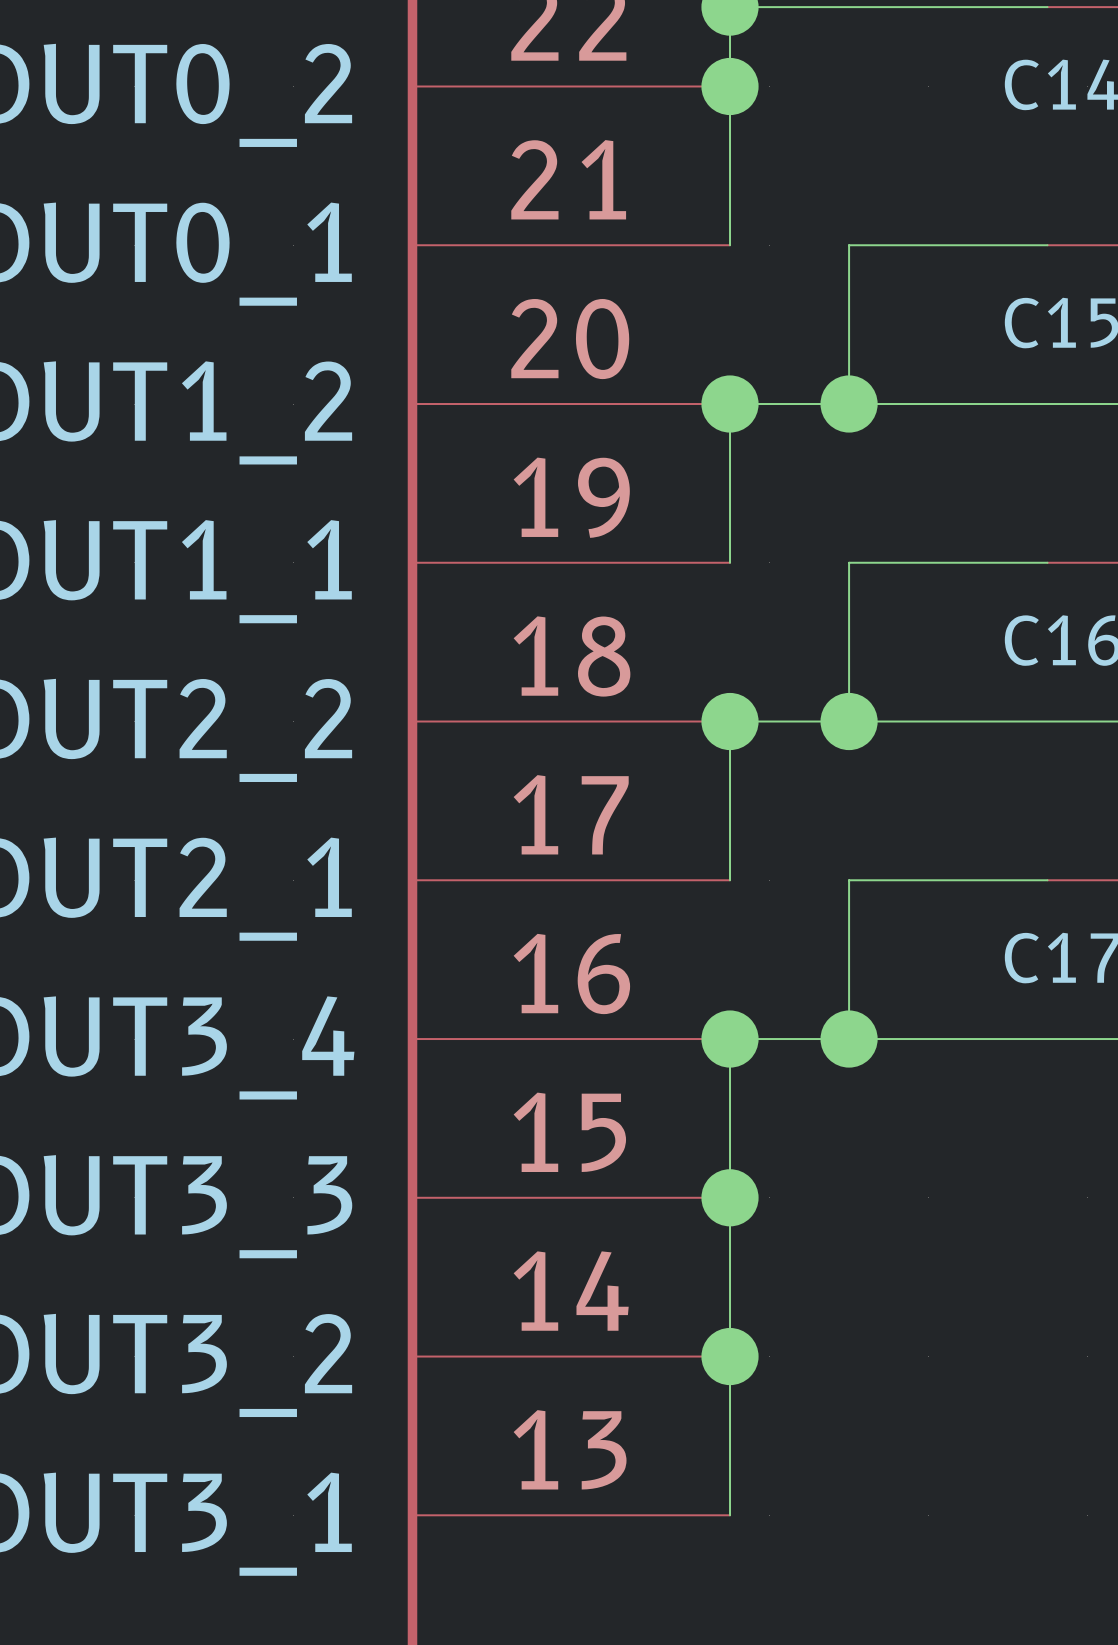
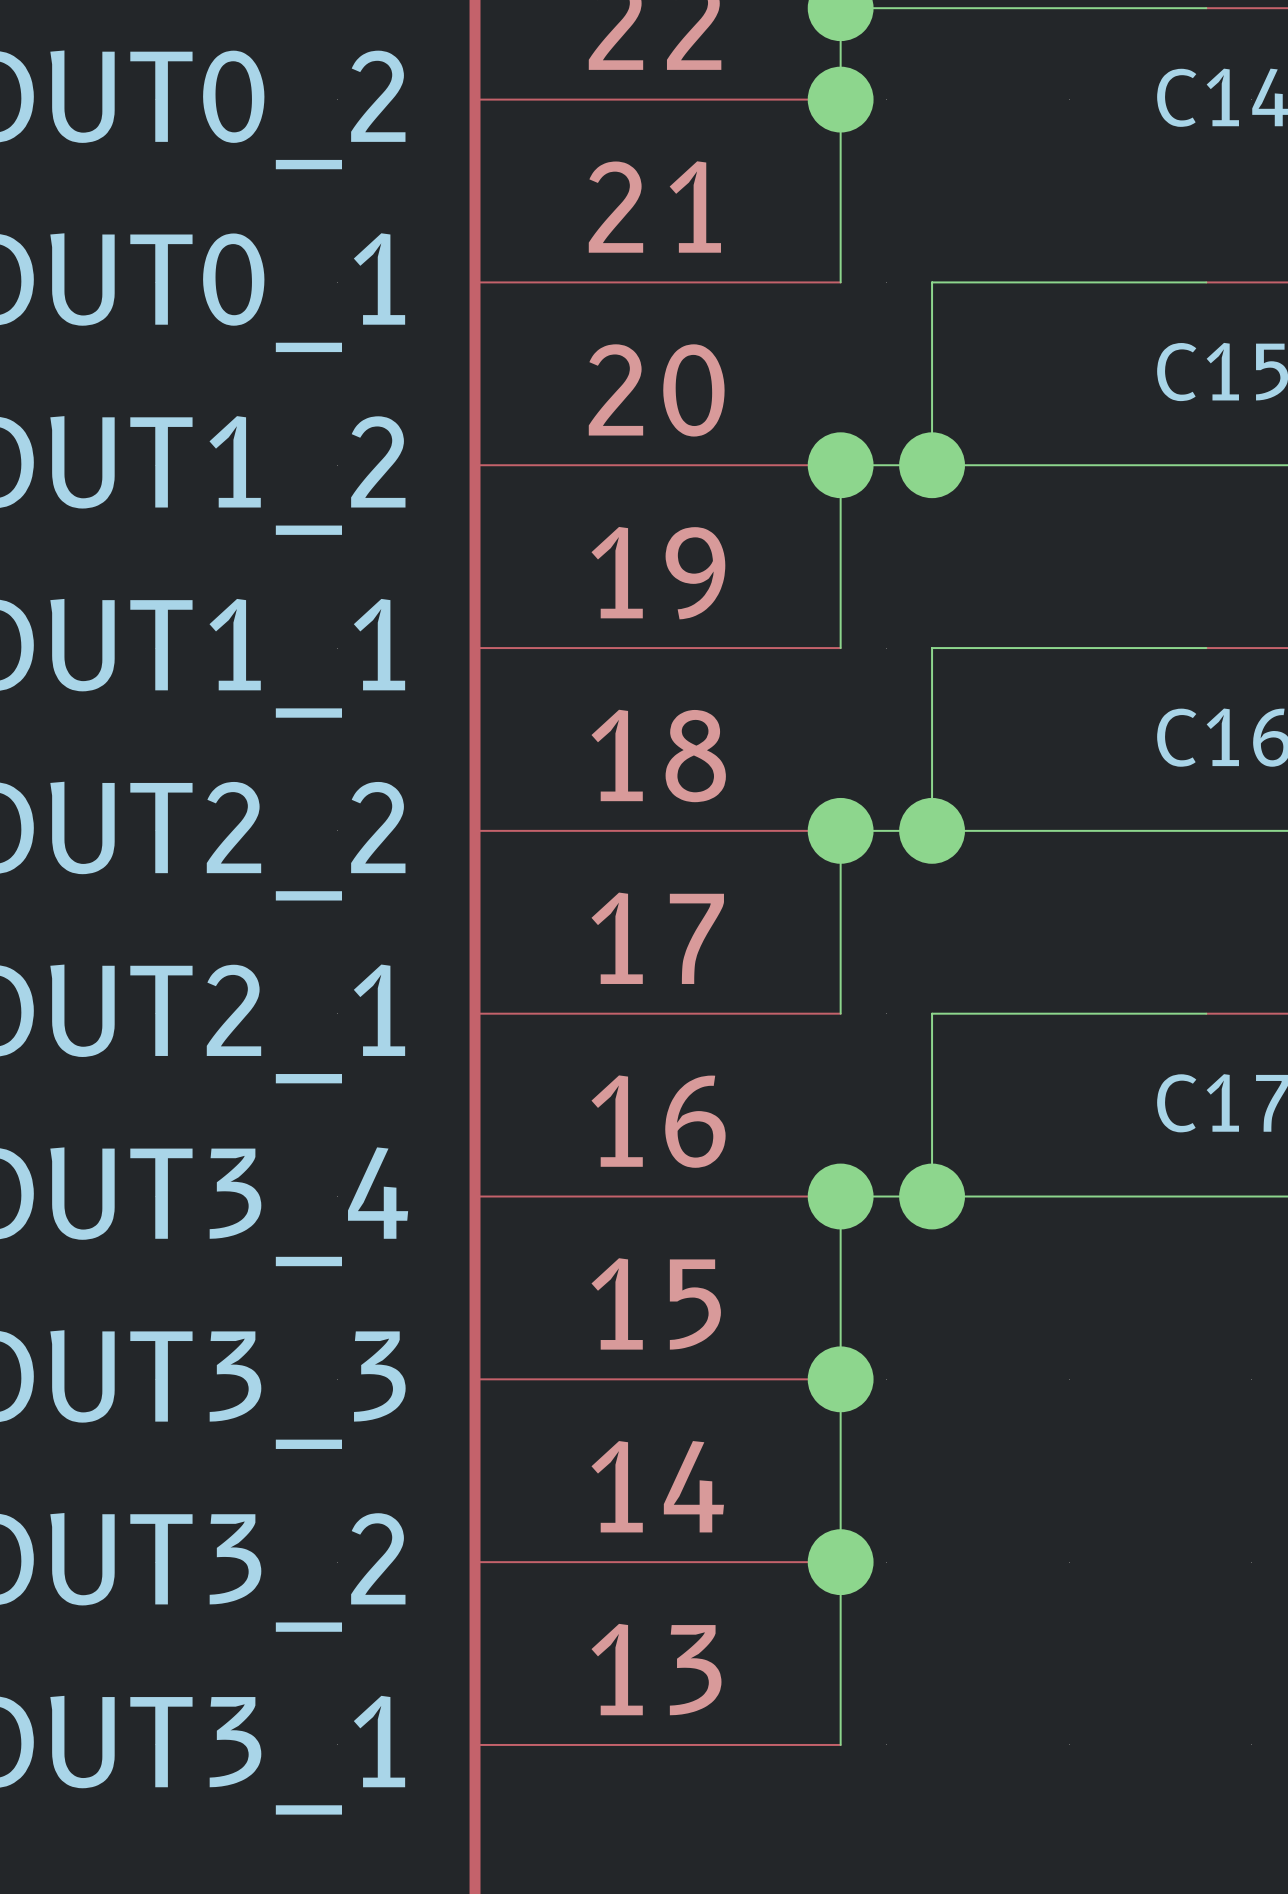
wire: (849, 245) (849, 404) -> (977, 282) (932, 282) (932, 465)
junction position: (849, 404) -> (932, 465)
wire: (849, 562) (849, 721) -> (977, 648) (932, 648) (932, 830)
junction position: (849, 721) -> (932, 830)
wire: (849, 880) (849, 1039) -> (977, 1013) (932, 1013) (932, 1196)
junction position: (849, 1039) -> (932, 1196)

